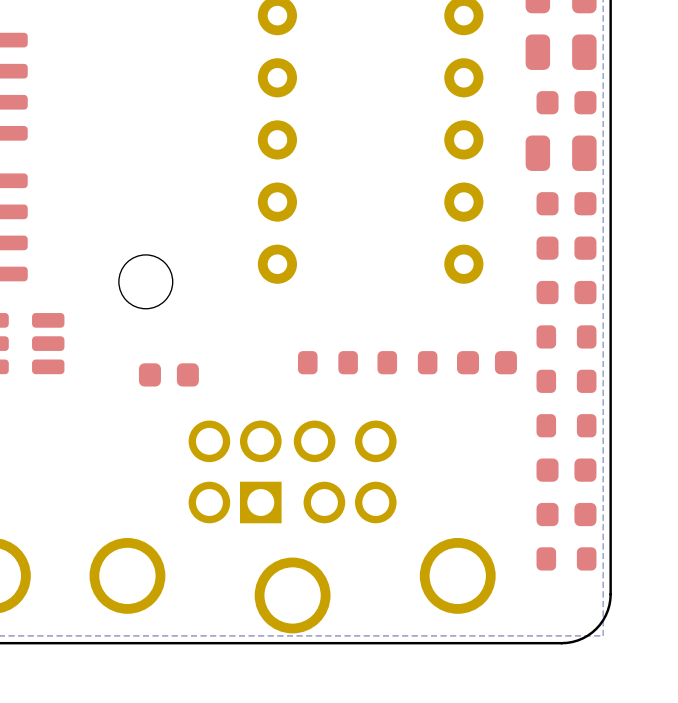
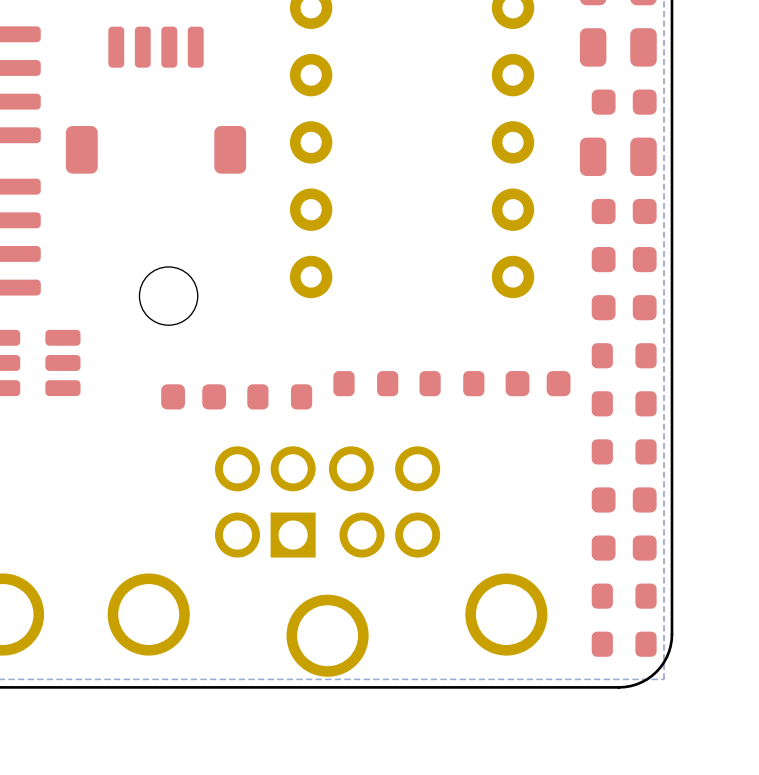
part: none -> (156, 100)
part: none -> (279, 396)
part: none -> (624, 644)

